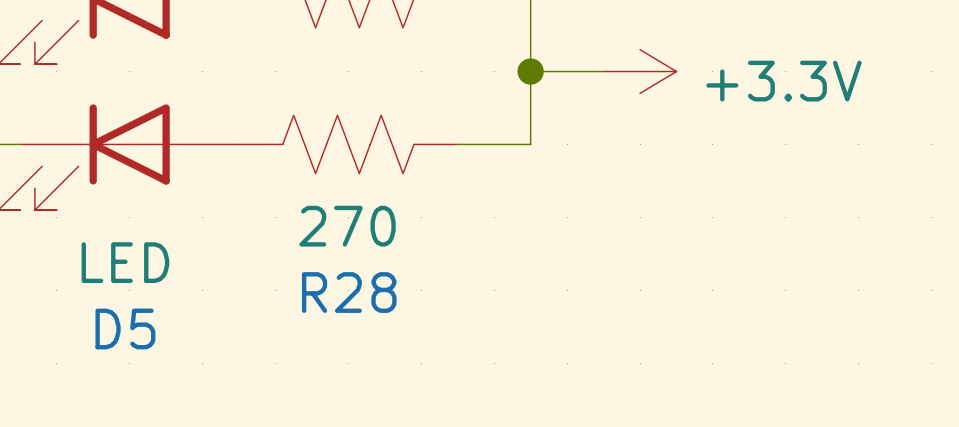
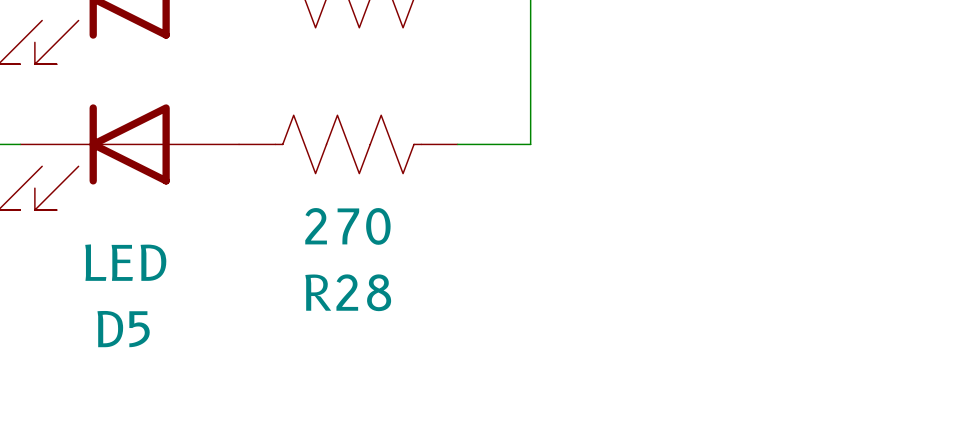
wire: (530, 71) (603, 71) -> none
junction: (530, 71) -> none
power symbol: +3.3V (640, 71) -> none

